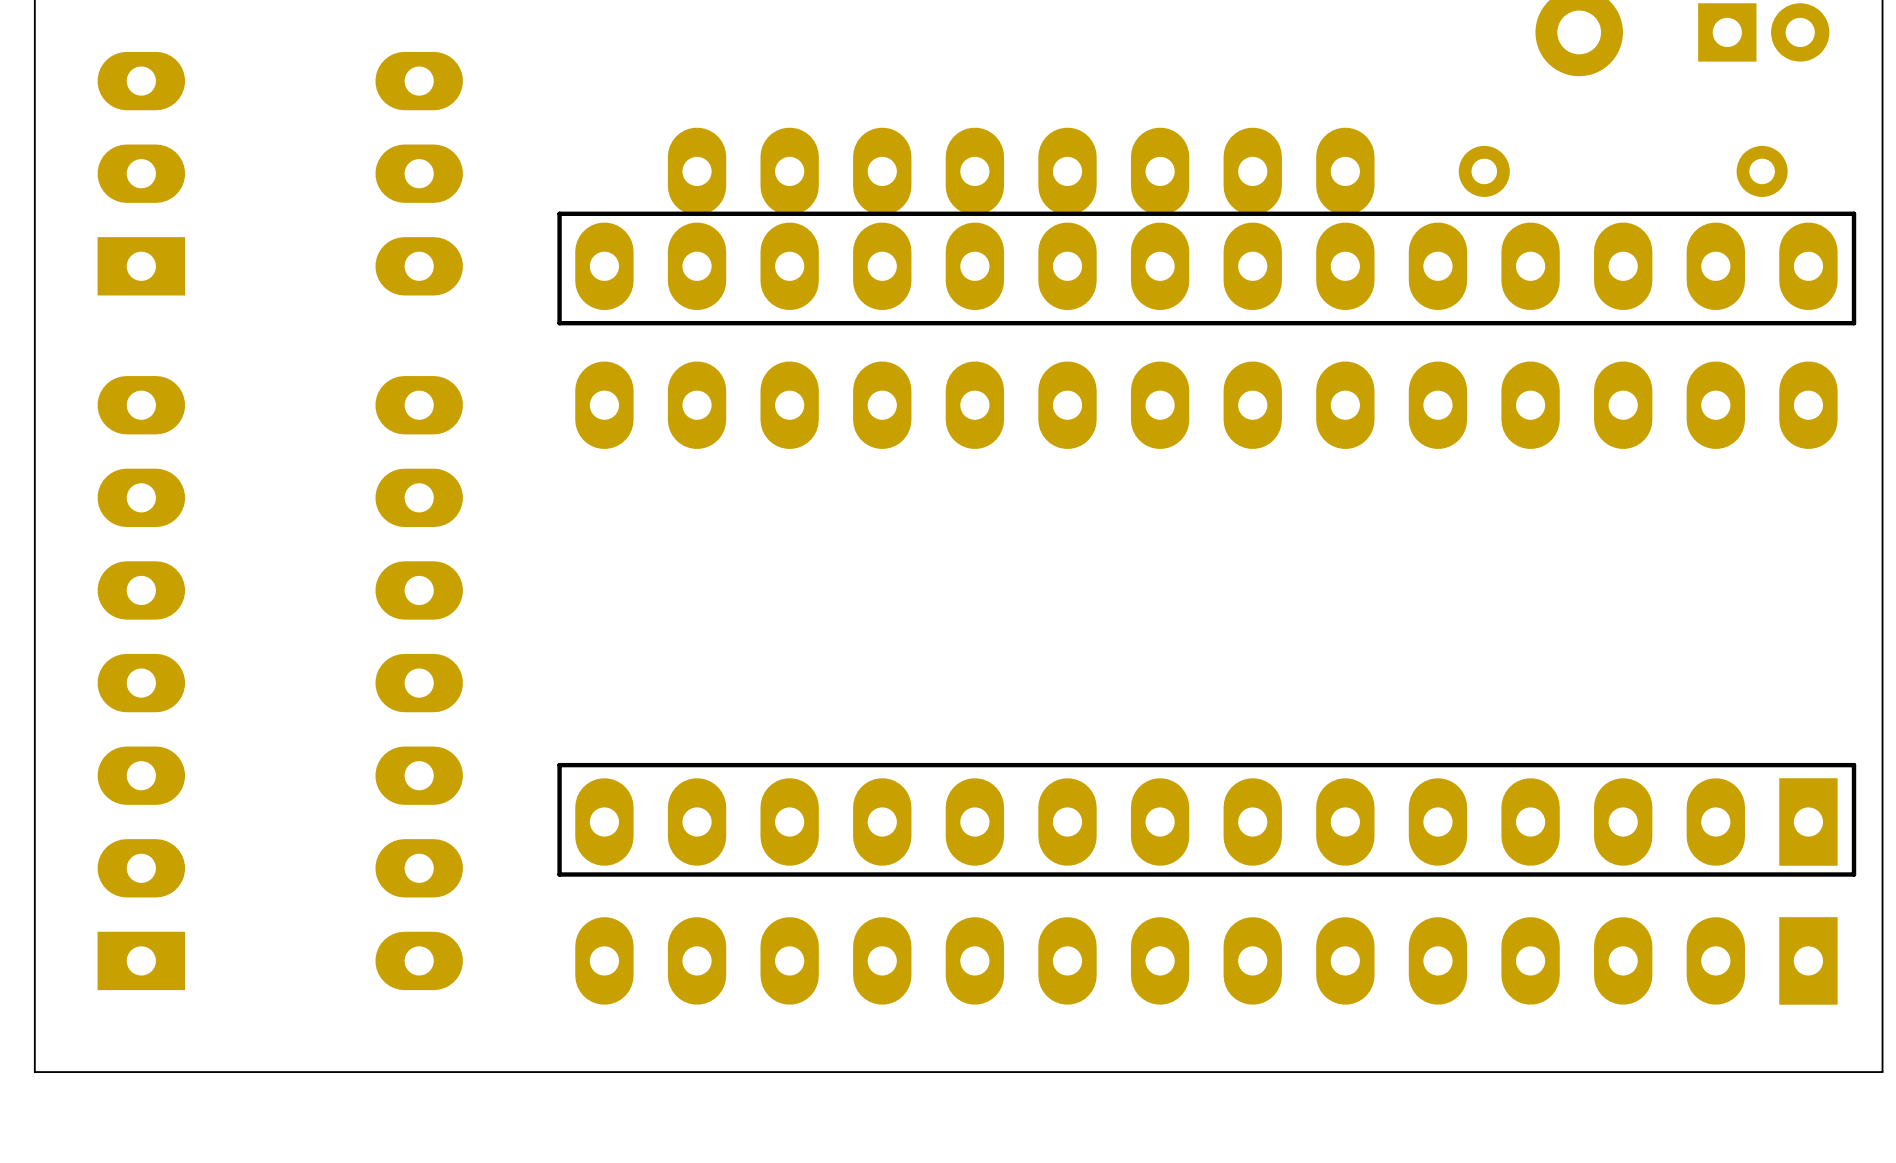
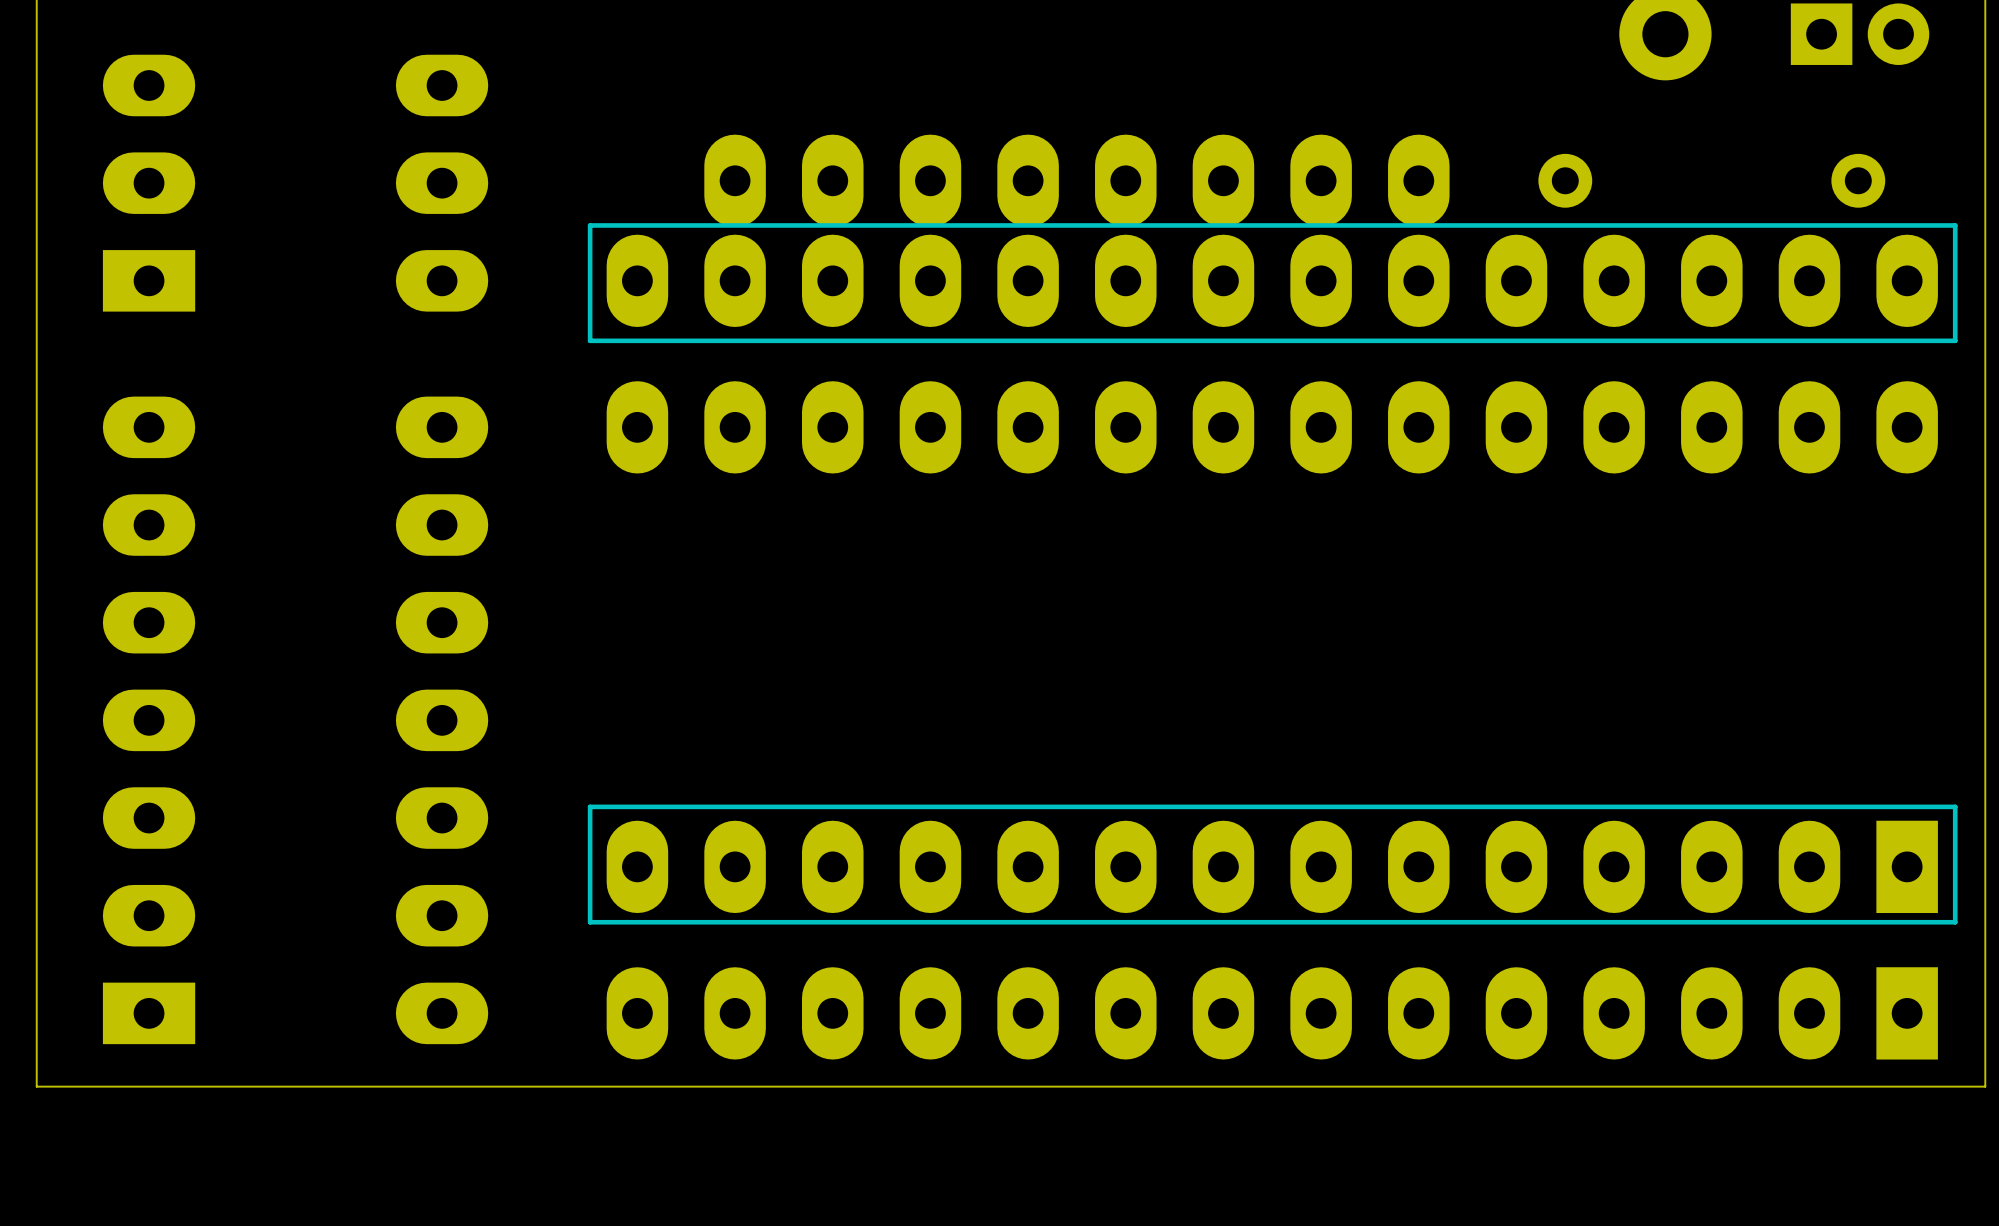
board edge: (1882, 1030) (1882, 1072) (34, 1072) (34, 1030) -> (1985, 1086) (36, 1086)

